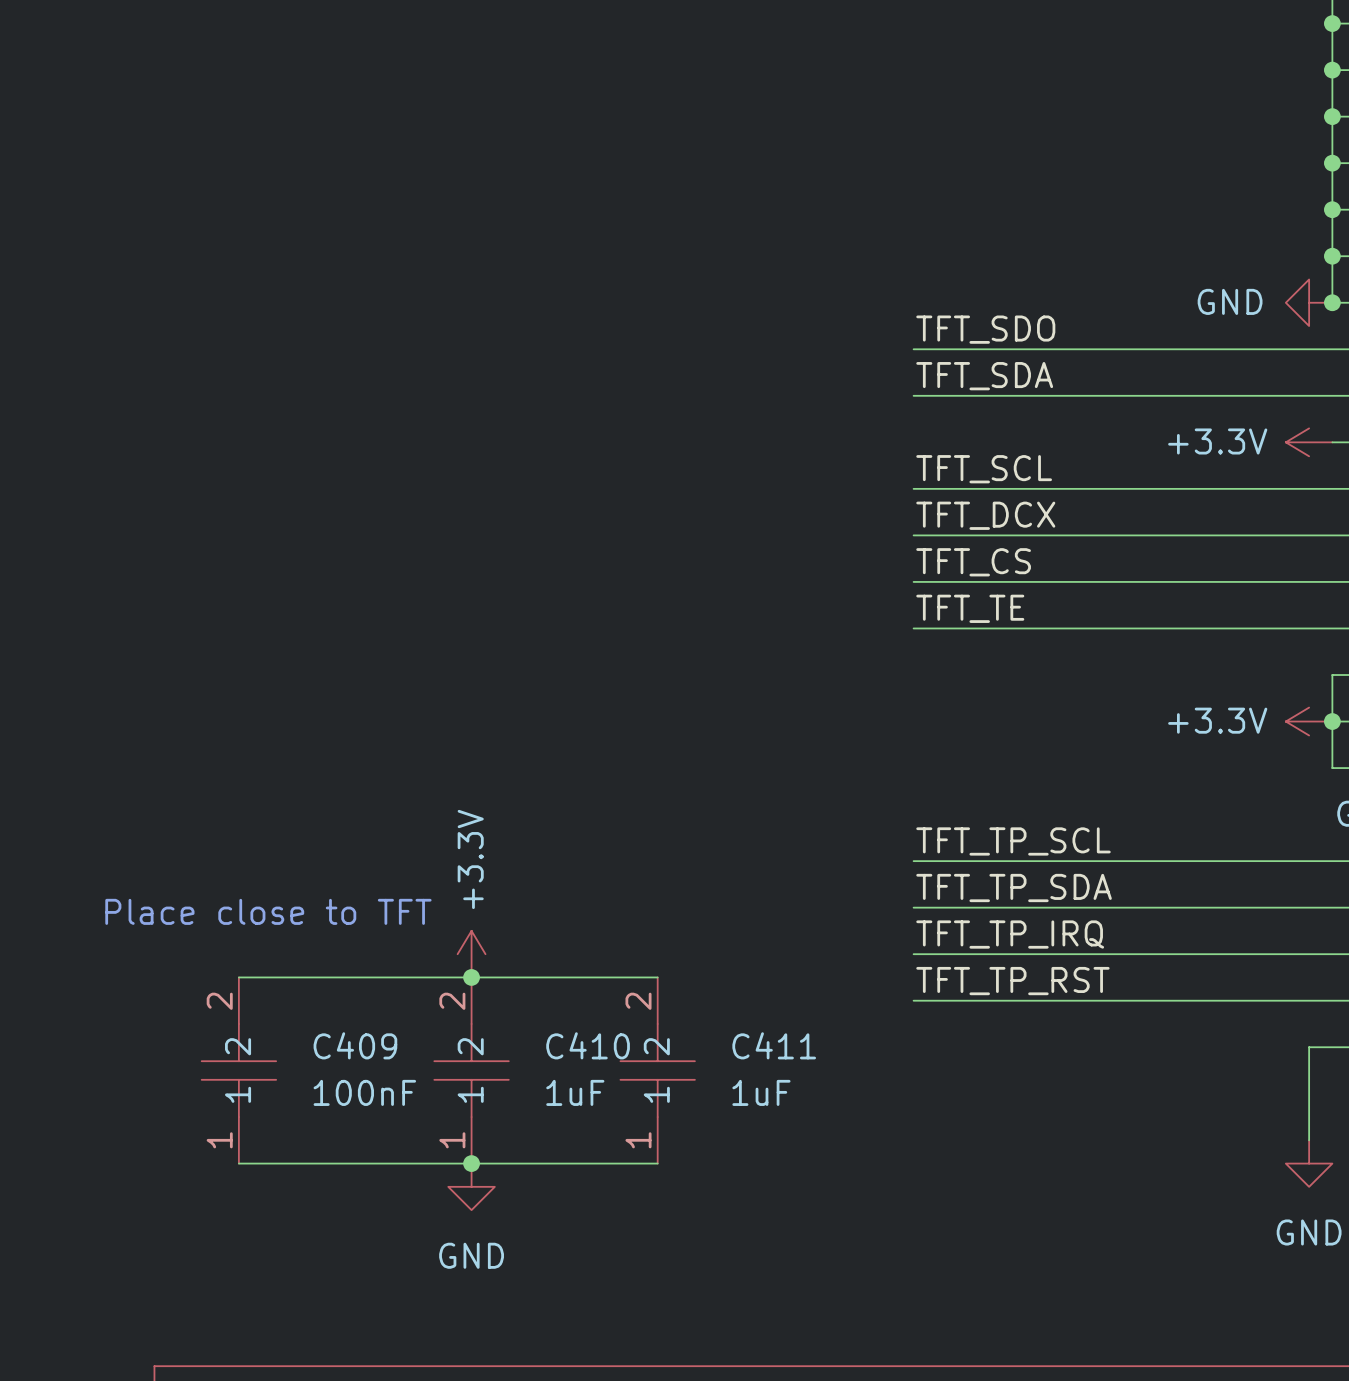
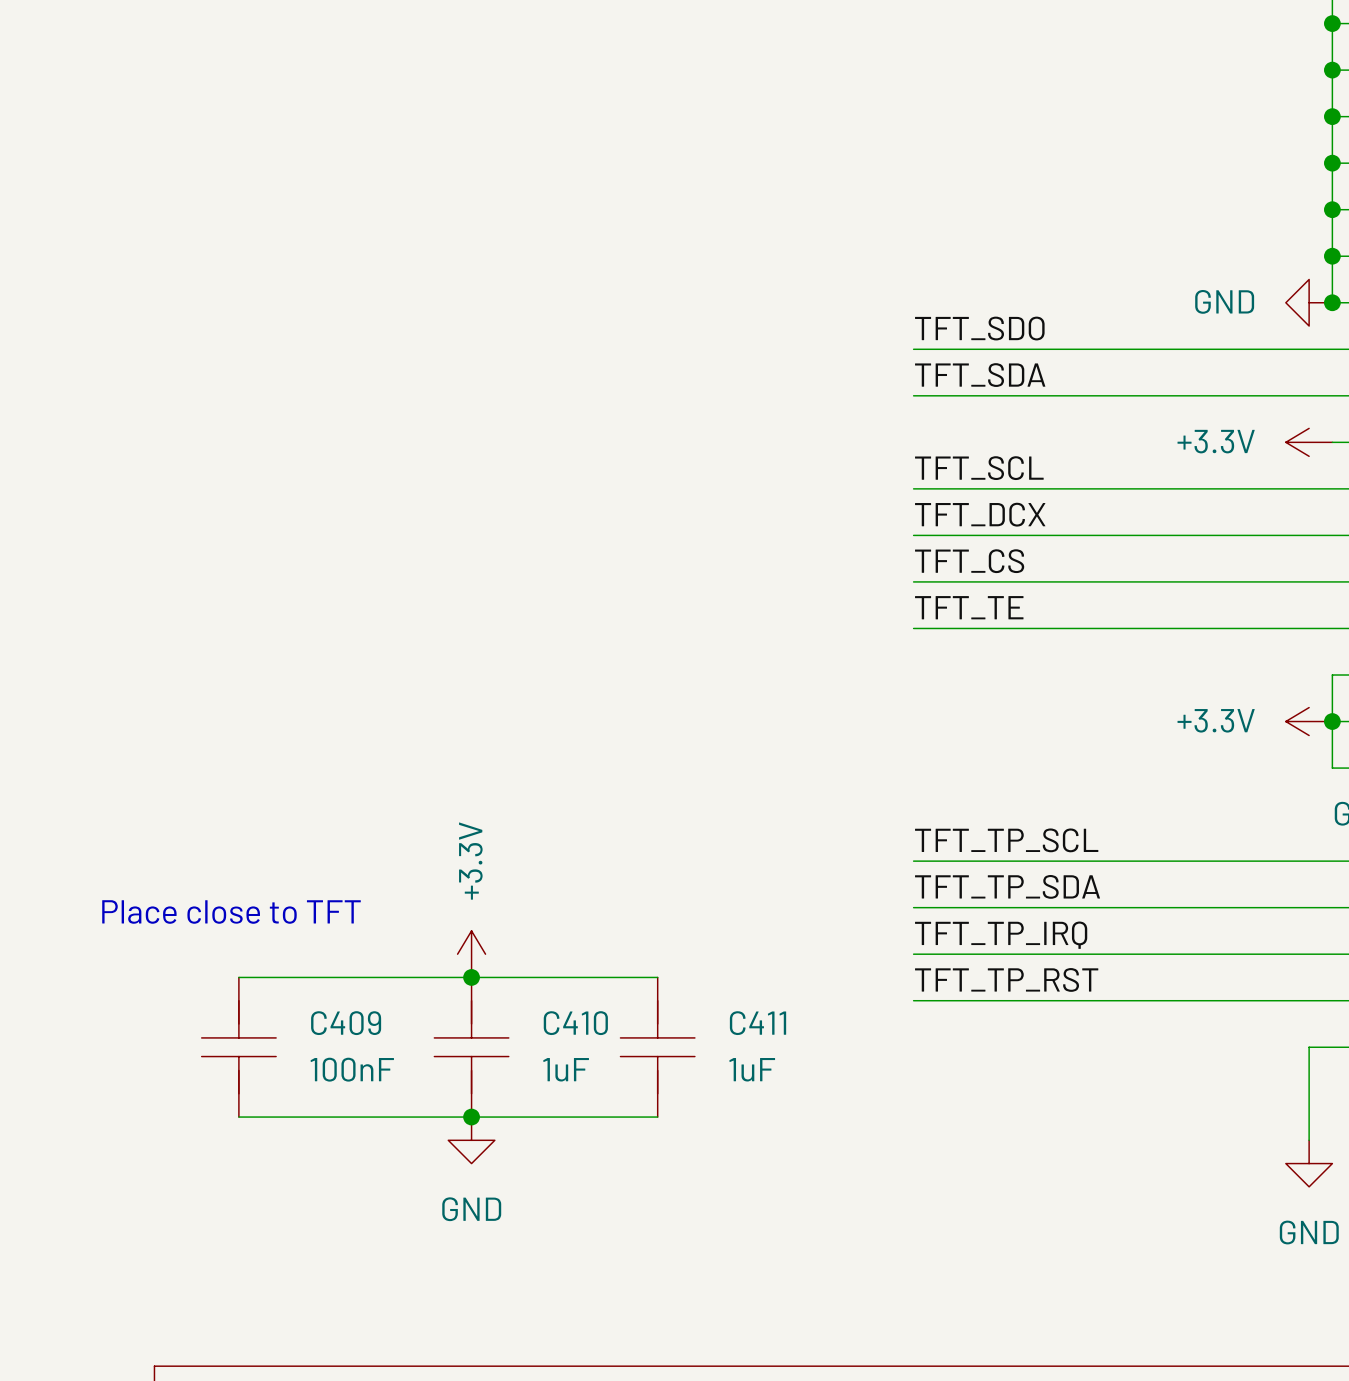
C409 symbol: [201, 977, 277, 1164] -> [201, 977, 277, 1118]
C410 symbol: [434, 977, 509, 1164] -> [434, 977, 509, 1118]
C411 symbol: [620, 977, 695, 1164] -> [620, 977, 695, 1118]
wire: (238, 1163) (657, 1163) -> (238, 1117) (657, 1117)
junction position: (471, 1163) -> (471, 1117)
power symbol position: GND (471, 1186) -> GND (471, 1140)

